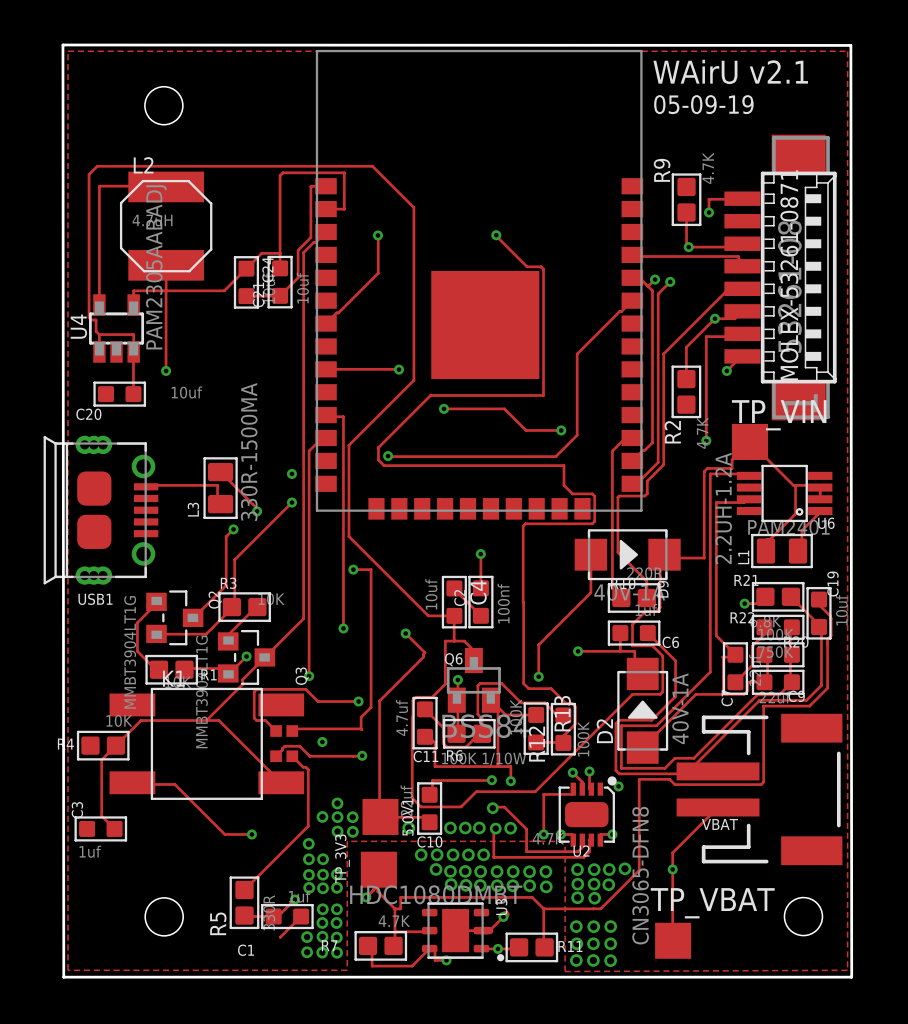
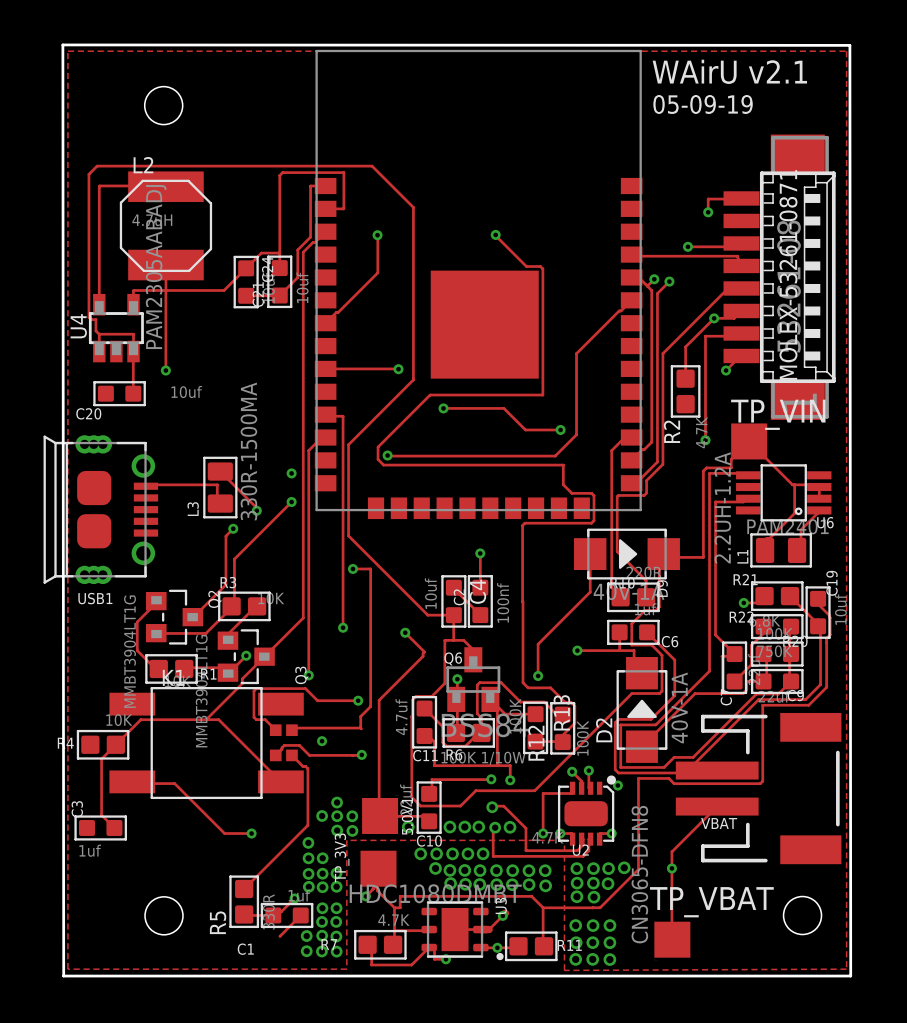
R9: 4.7K (686, 199) -> none
track: (686, 212) (686, 244) -> none

